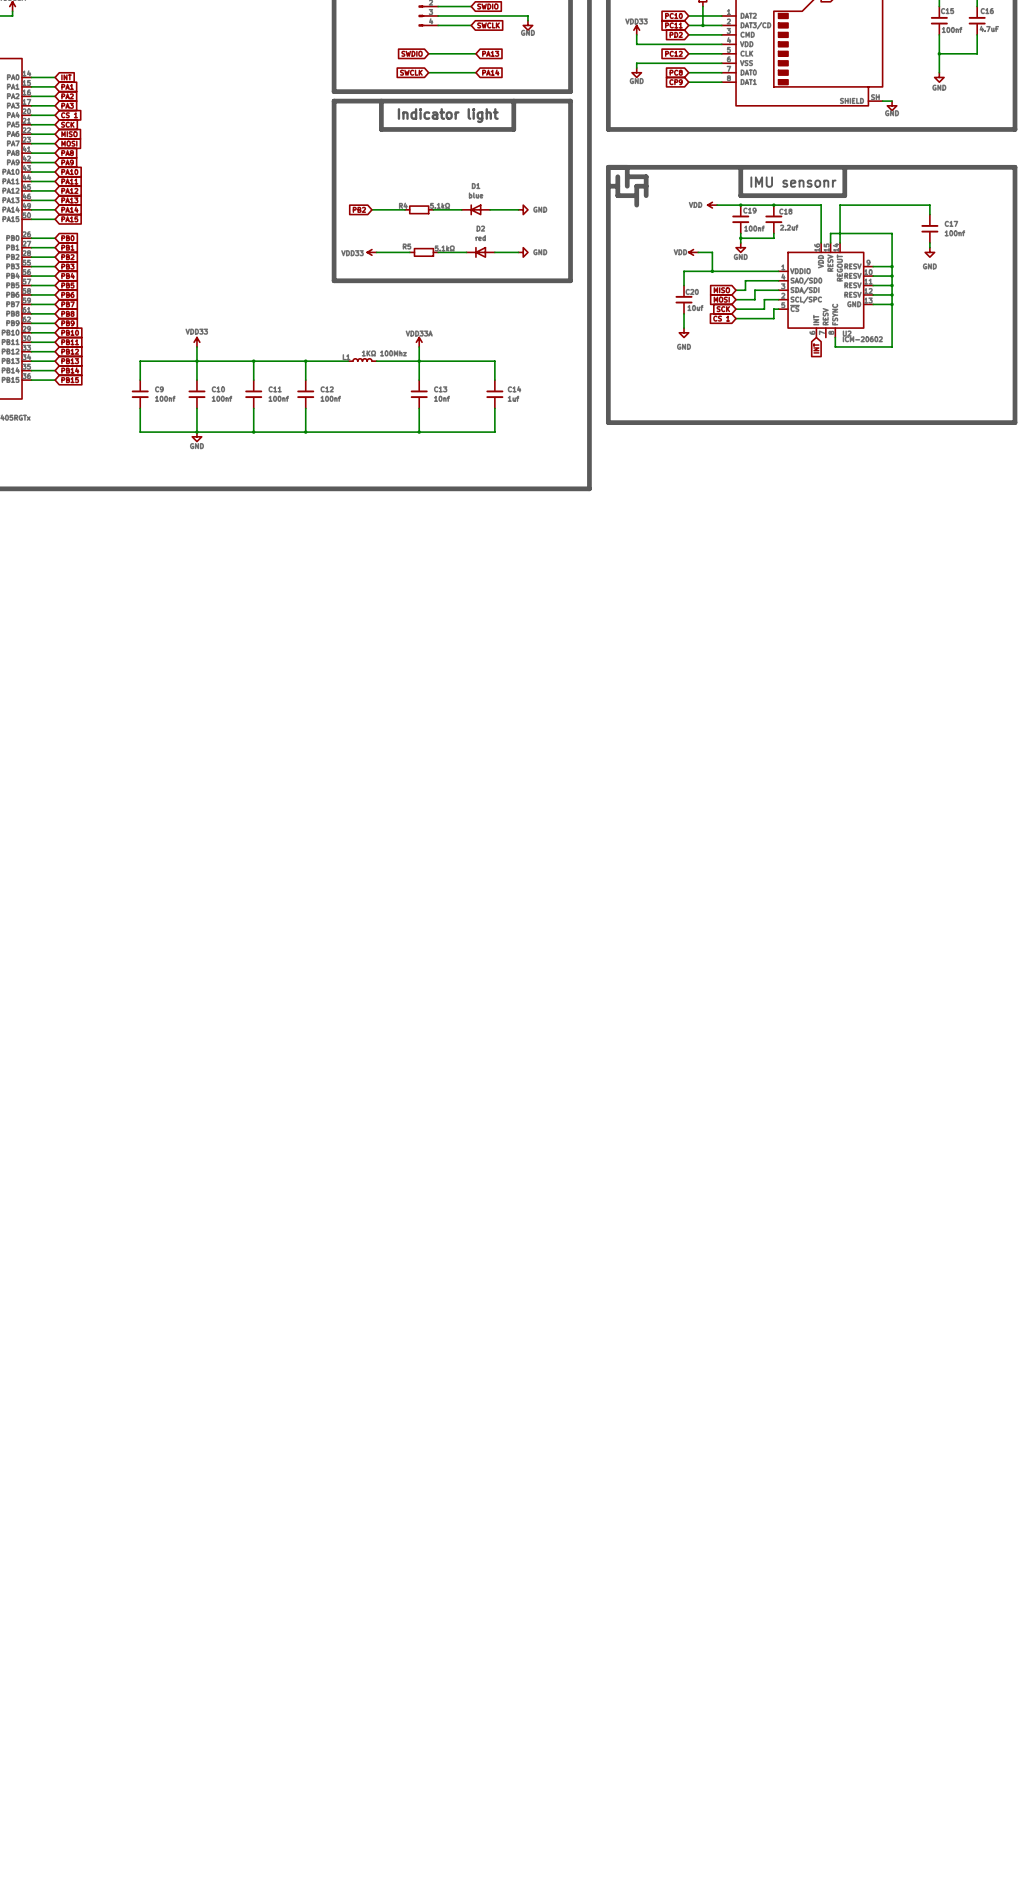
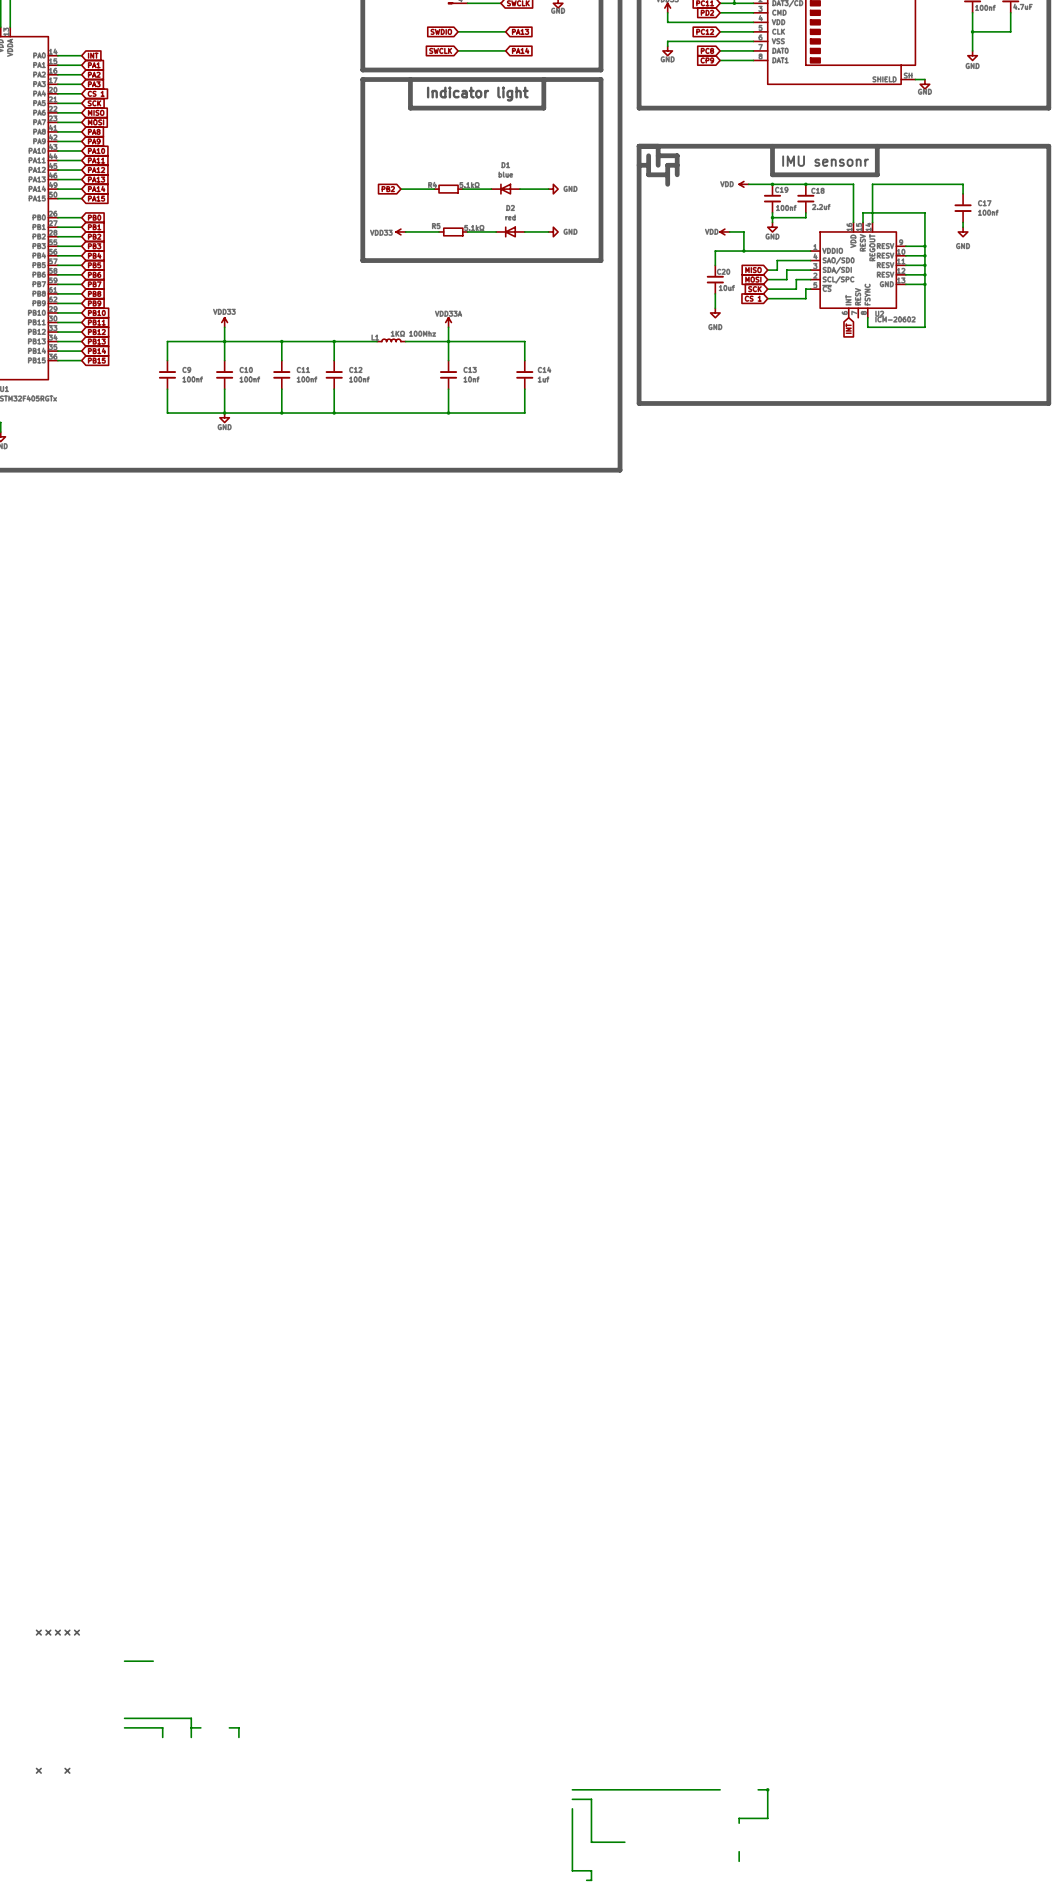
no-connect mark: none -> (38, 1632)
no-connect mark: none -> (48, 1632)
no-connect mark: none -> (57, 1632)
no-connect mark: none -> (67, 1632)
no-connect mark: none -> (76, 1632)
wire: none -> (124, 1661) (153, 1661)
wire: none -> (124, 1718) (191, 1718) (191, 1737)
wire: none -> (124, 1727) (162, 1727) (162, 1737)
wire: none -> (191, 1727) (200, 1727)
wire: none -> (229, 1727) (238, 1727) (238, 1737)
no-connect mark: none -> (38, 1770)
no-connect mark: none -> (67, 1770)
wire: none -> (572, 1789) (720, 1789)
wire: none -> (758, 1789) (767, 1789) (767, 1818) (739, 1818) (739, 1823)
junction: none -> (767, 1789)
wire: none -> (572, 1799) (591, 1799) (591, 1842) (624, 1842)
wire: none -> (572, 1808) (572, 1870) (591, 1870) (591, 1880) (586, 1880)
wire: none -> (739, 1851) (739, 1861)

